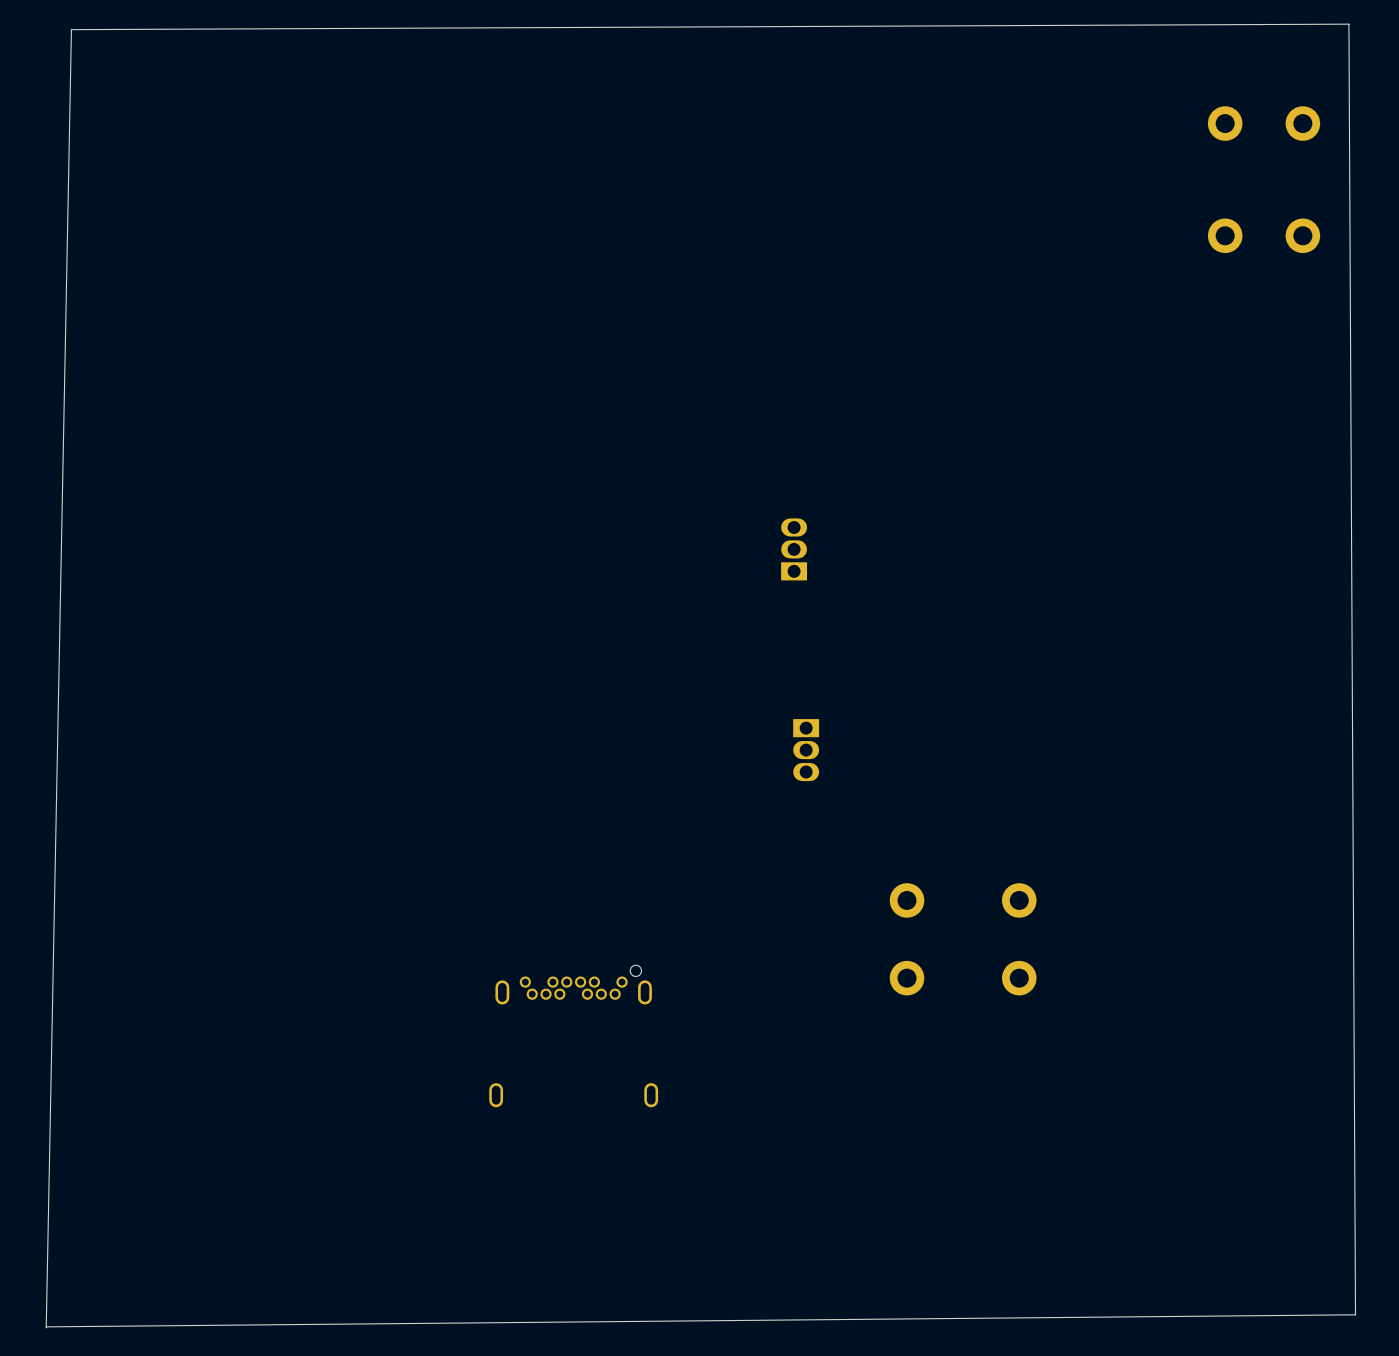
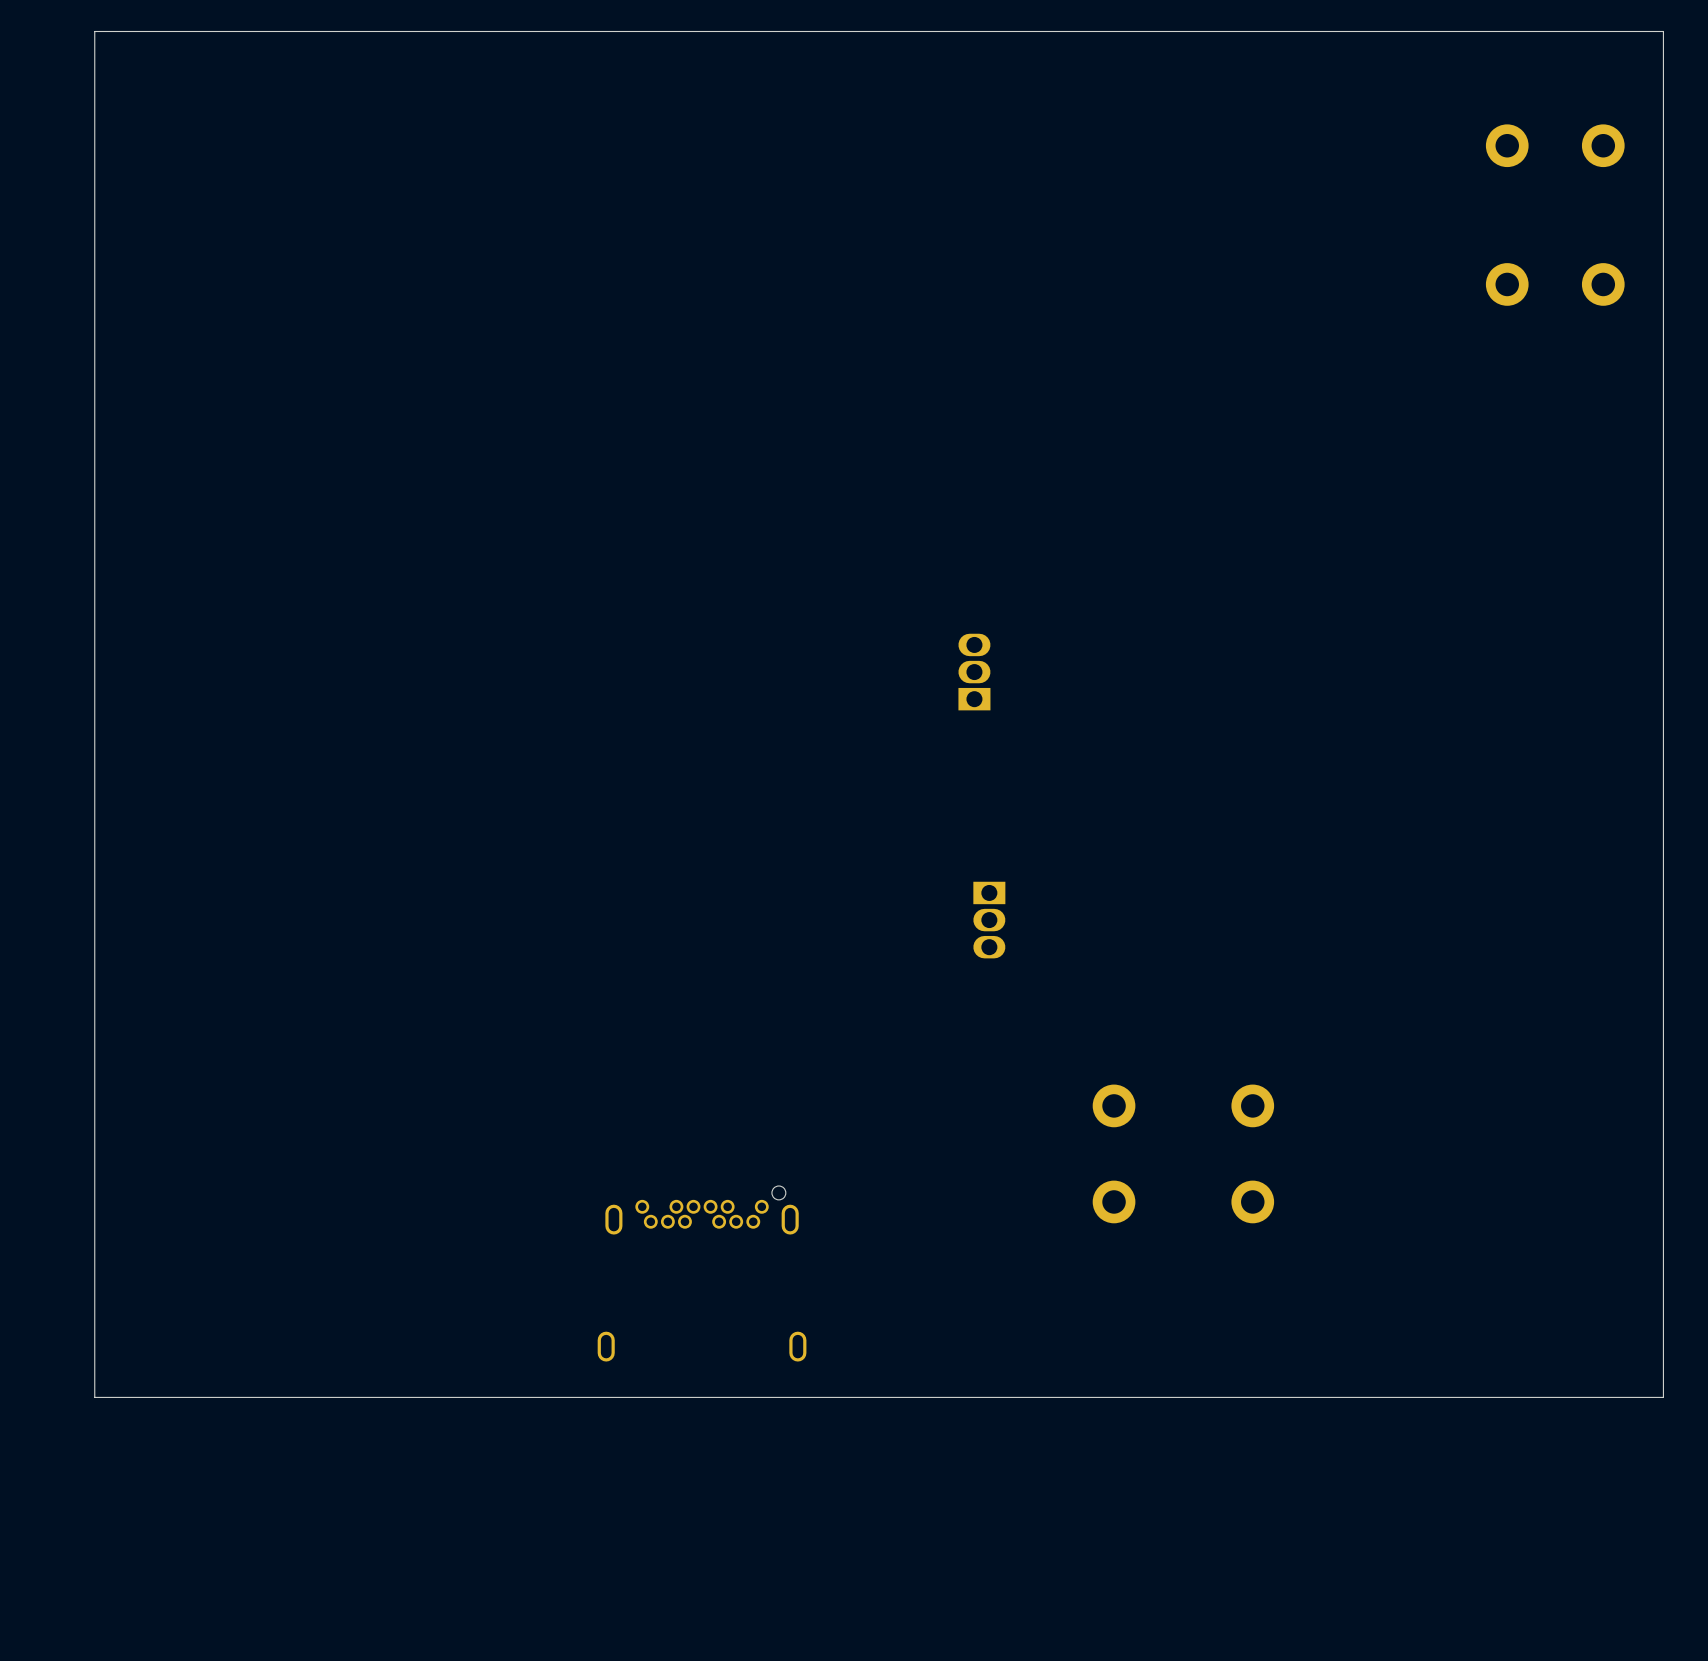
board edge: none -> (1663, 31) (1663, 1397) (94, 1397) (94, 31) (1663, 31)
board edge: (46, 1326) (1355, 1314) (1348, 24) (71, 29) (46, 1327) -> none

